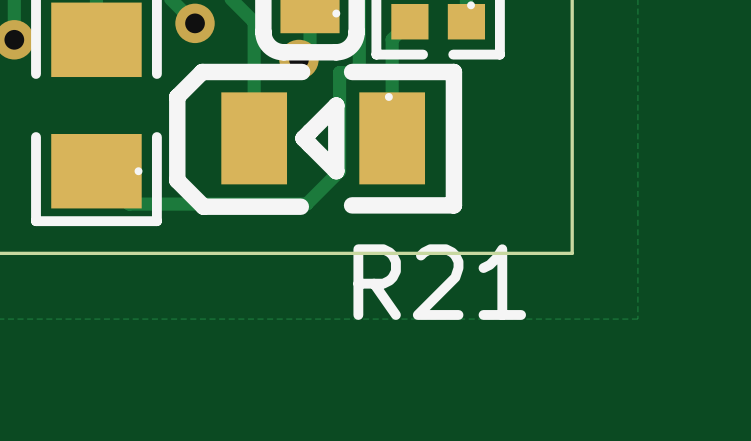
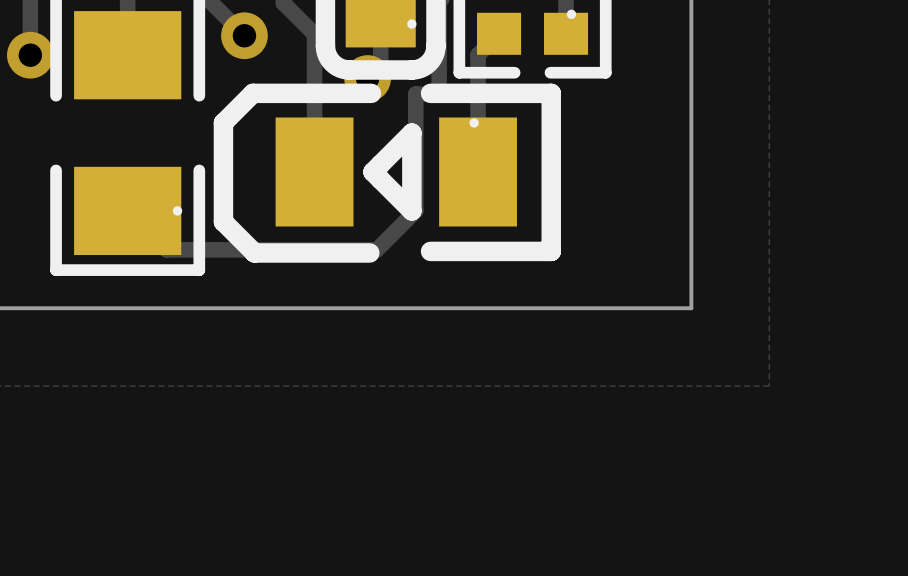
R21 name: R21 (439, 282) -> none

